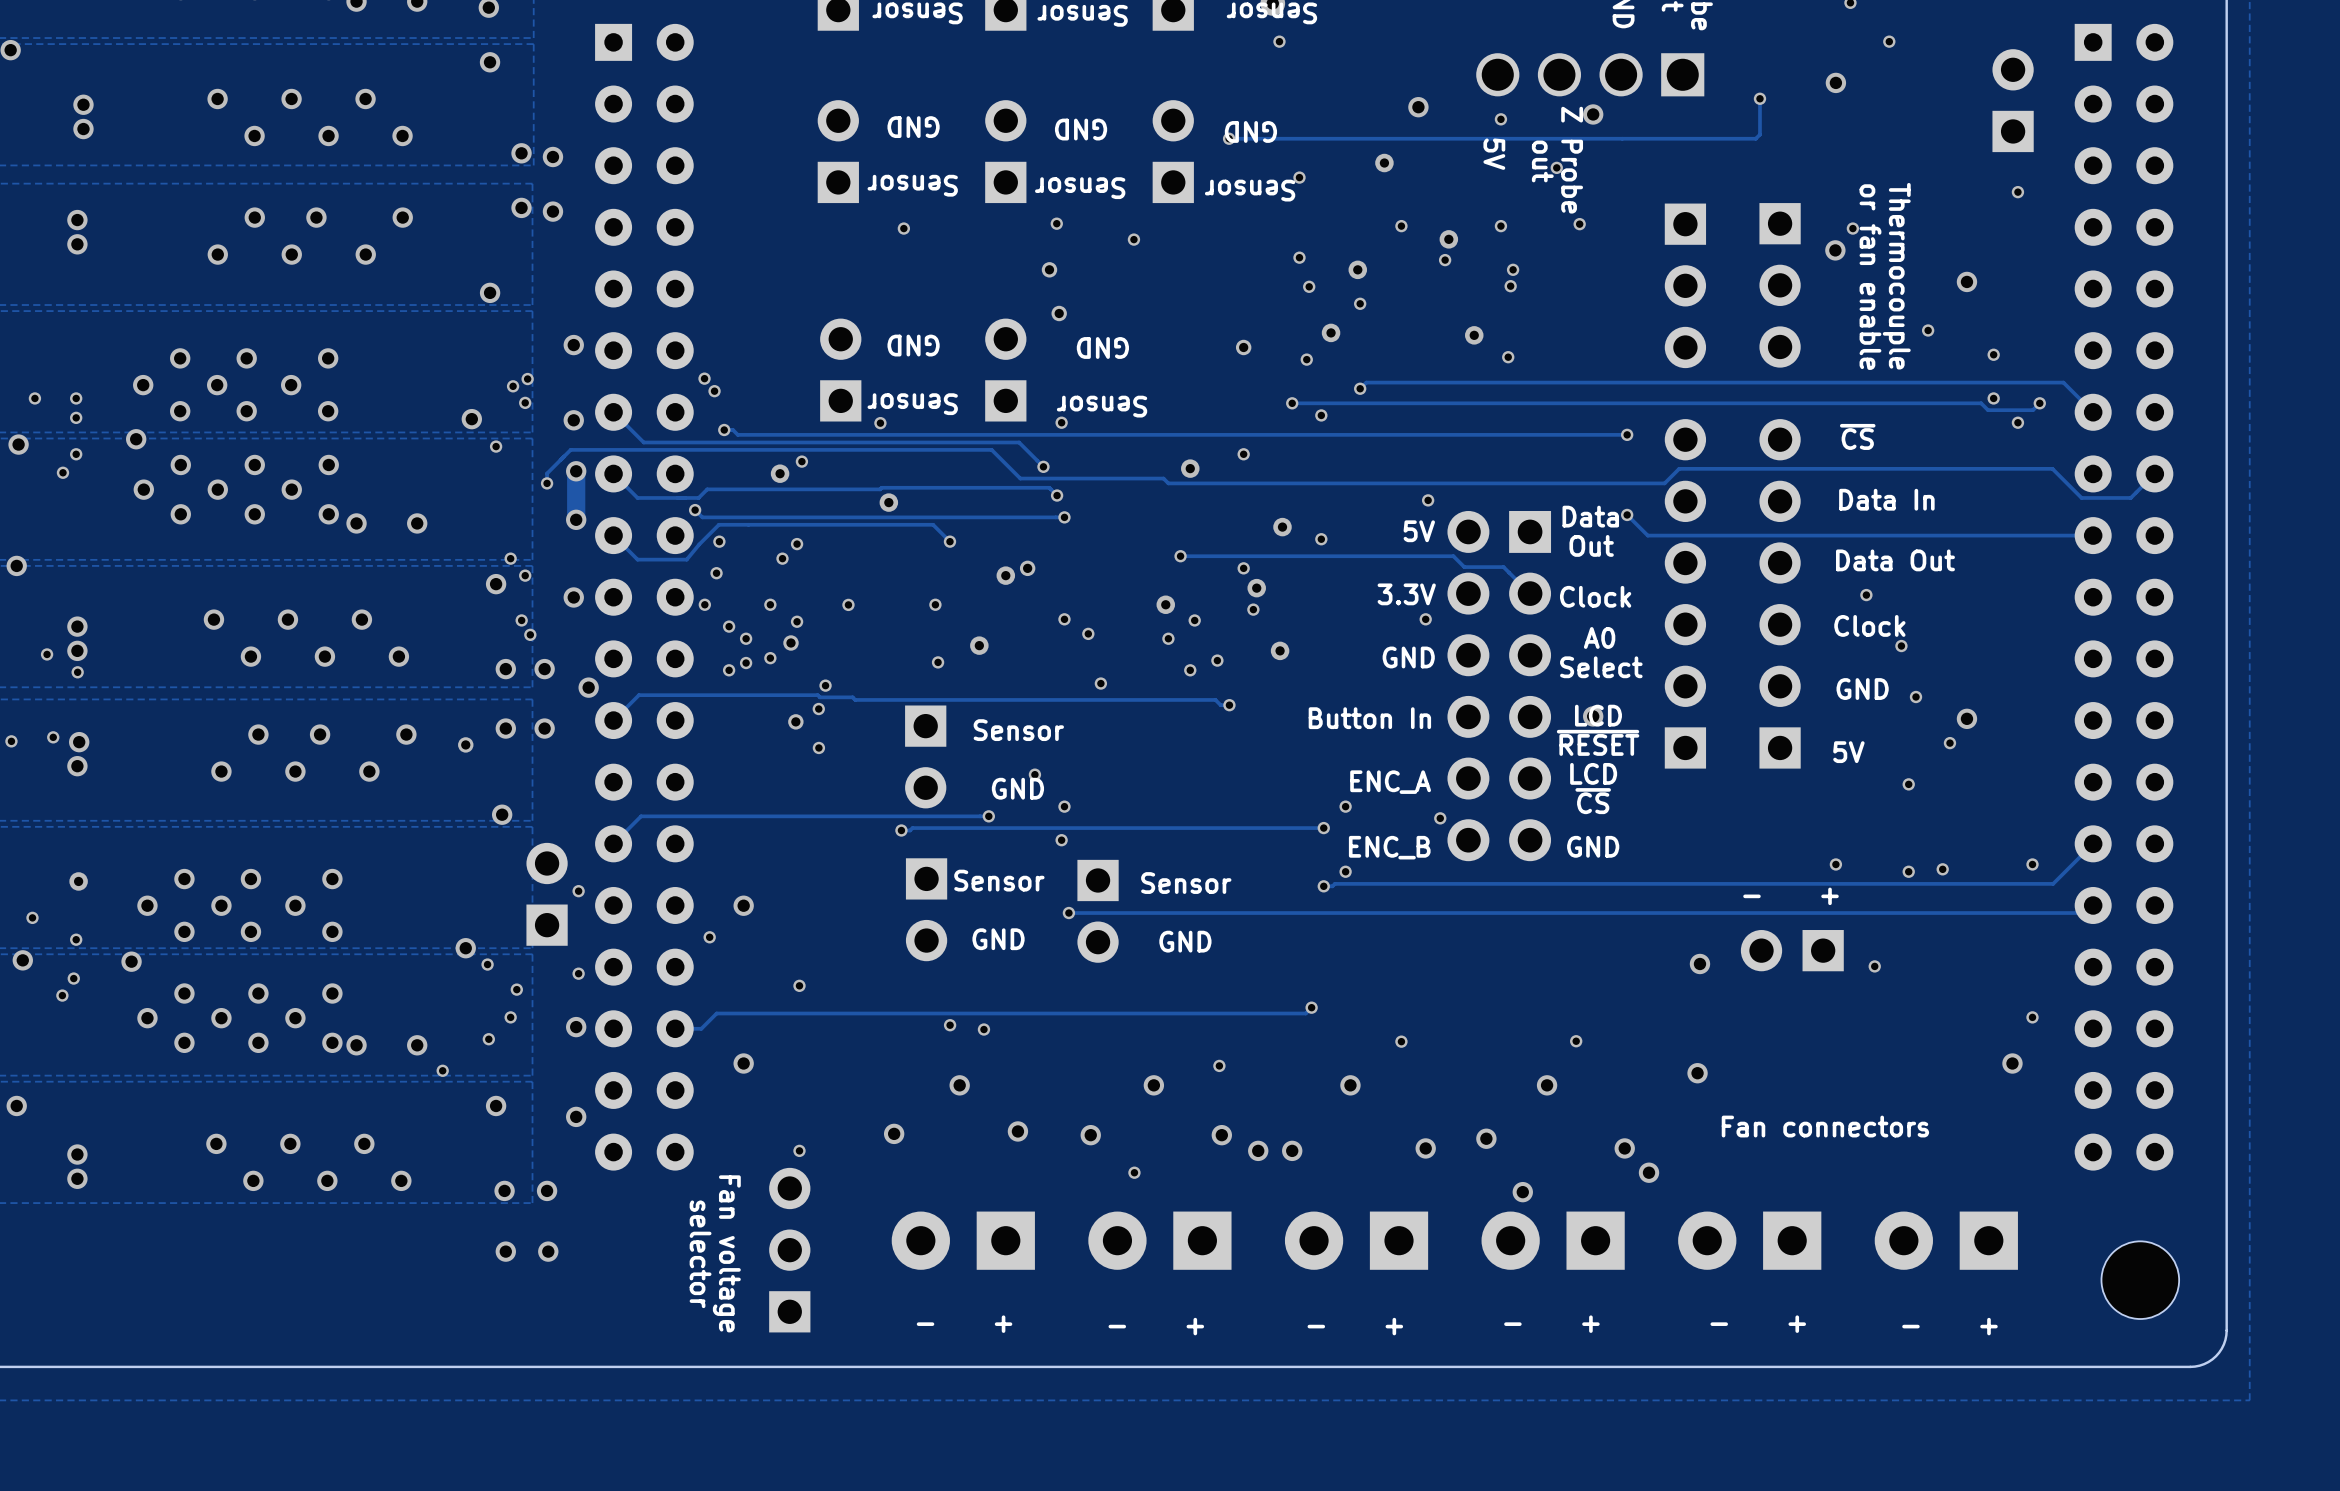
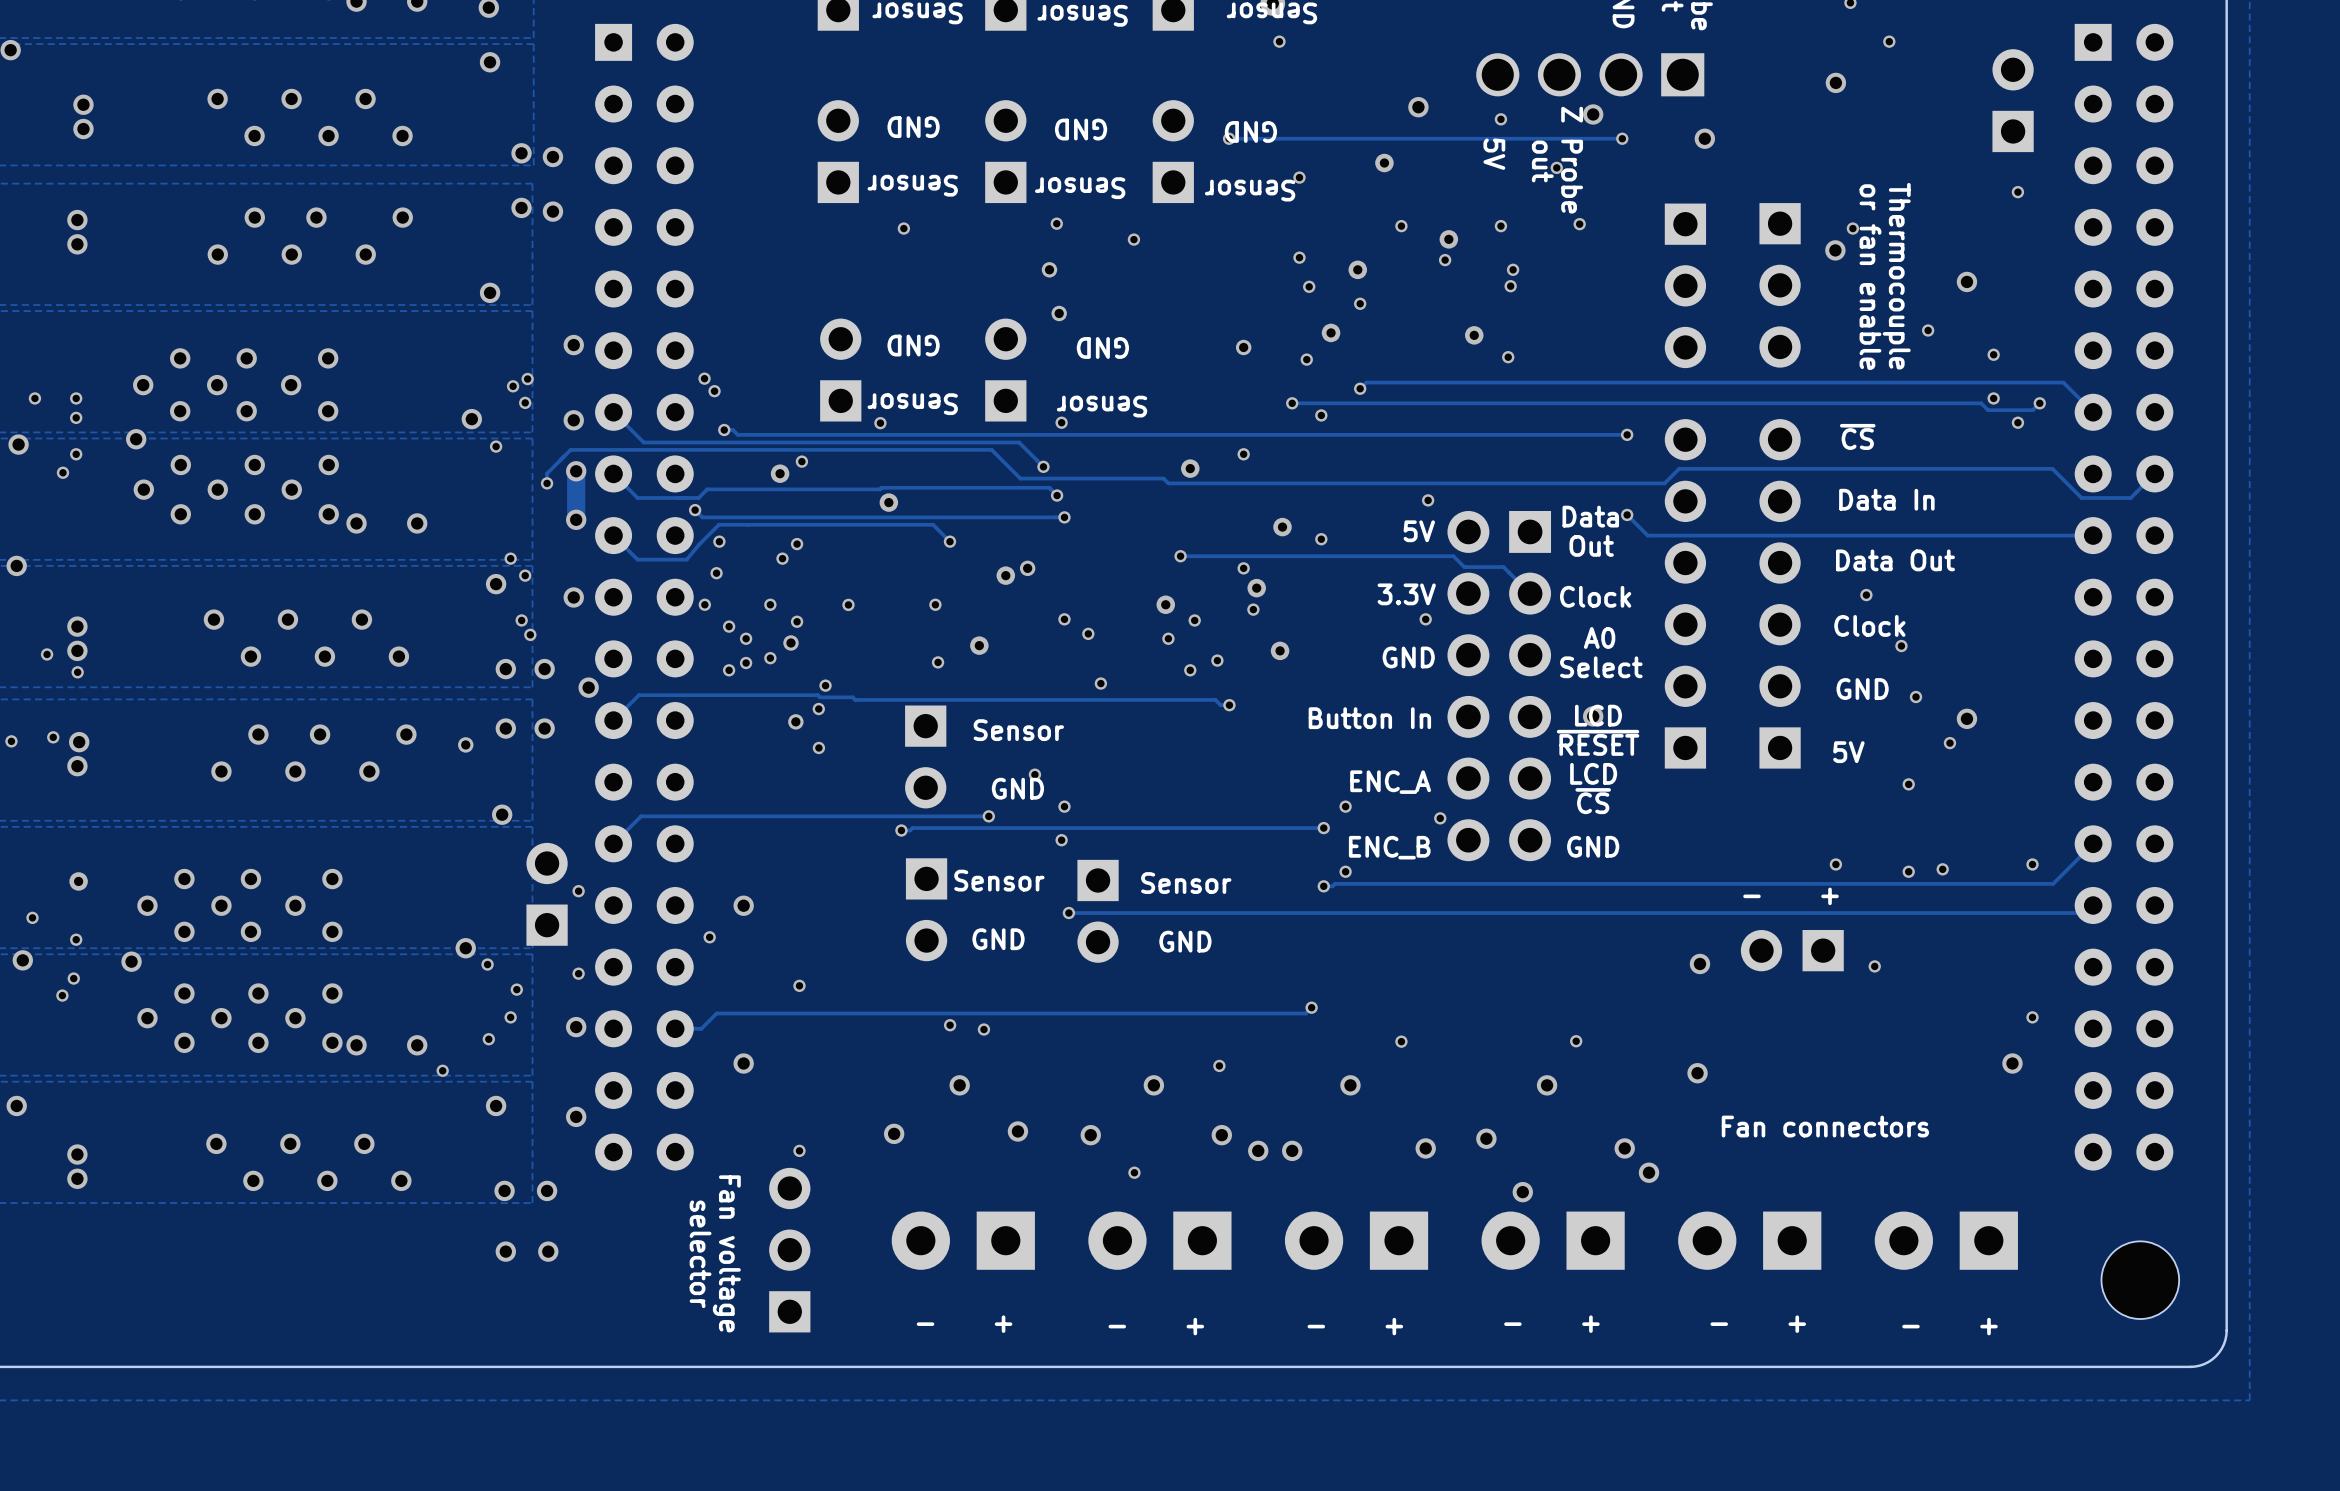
track: (1759, 98) (1759, 134) (1755, 138) (1622, 138) -> none
via position: (1759, 98) -> (1622, 138)
via: none -> (1704, 138)

